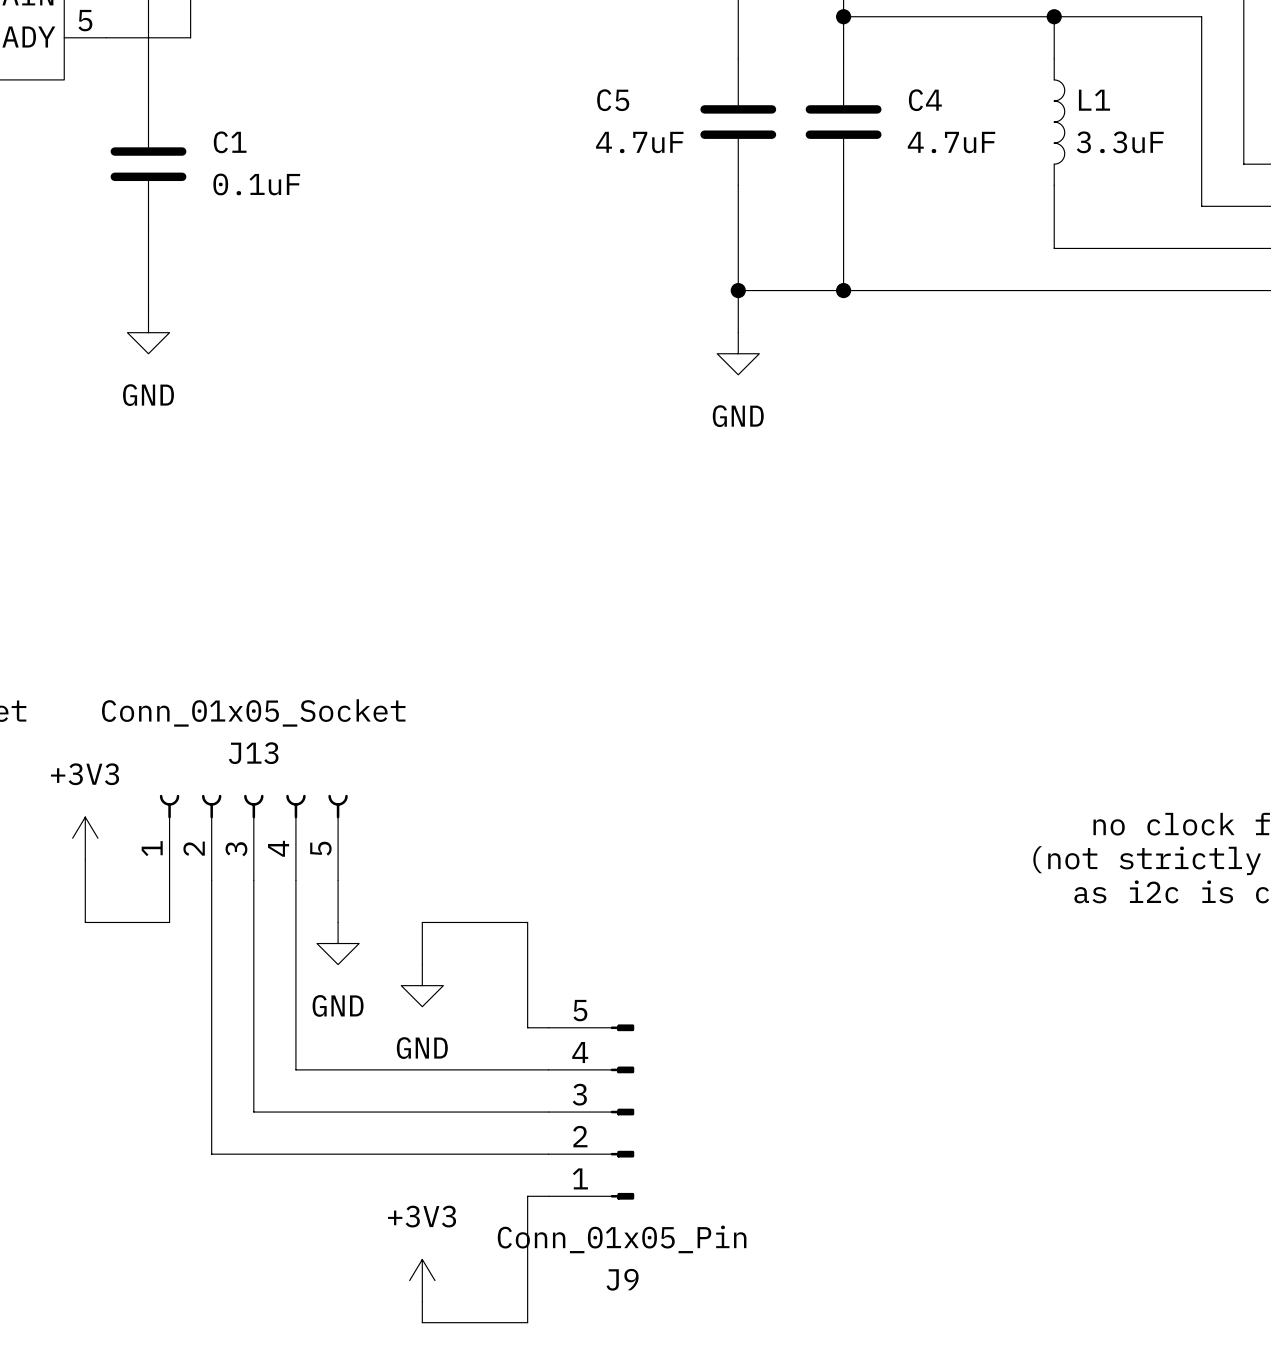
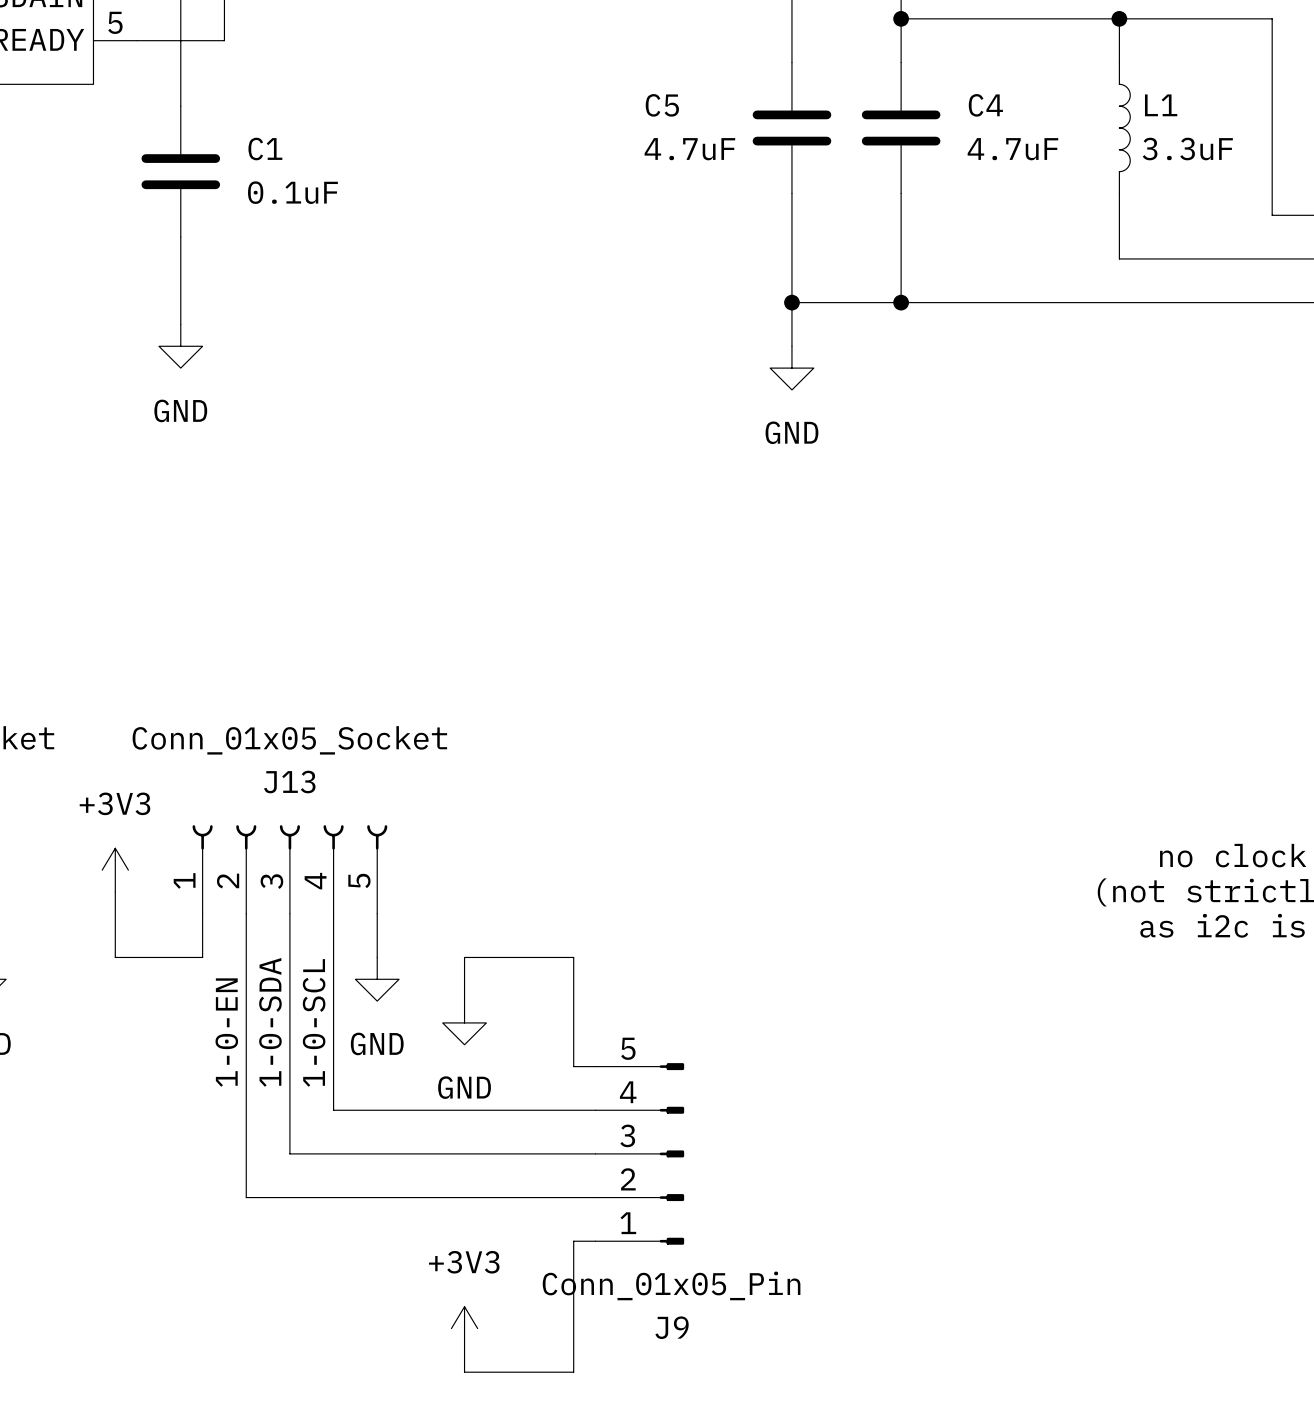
label: none -> 1-0-SDA (270, 1022)
label: none -> 1-0-SCL (314, 1022)
label: none -> 1-0-EN (226, 1032)

